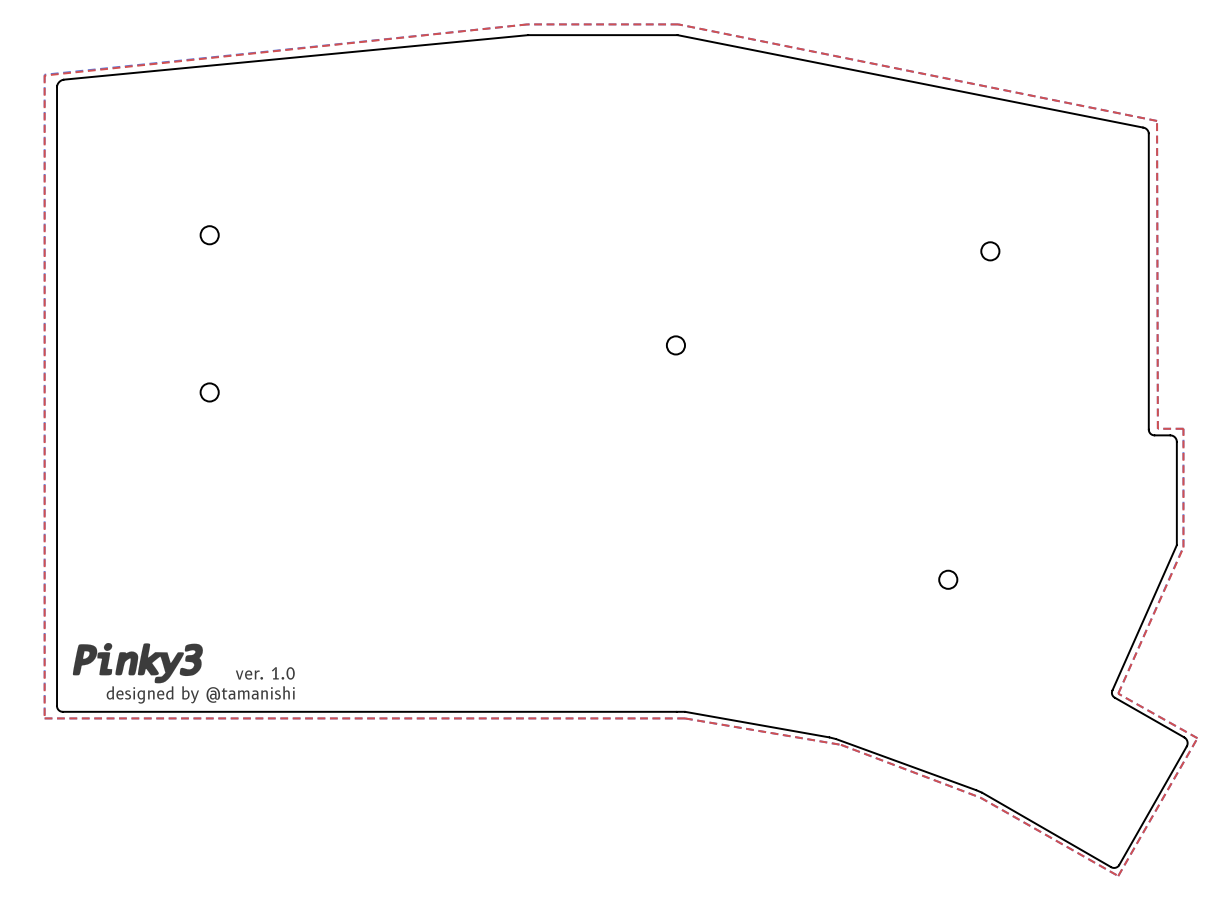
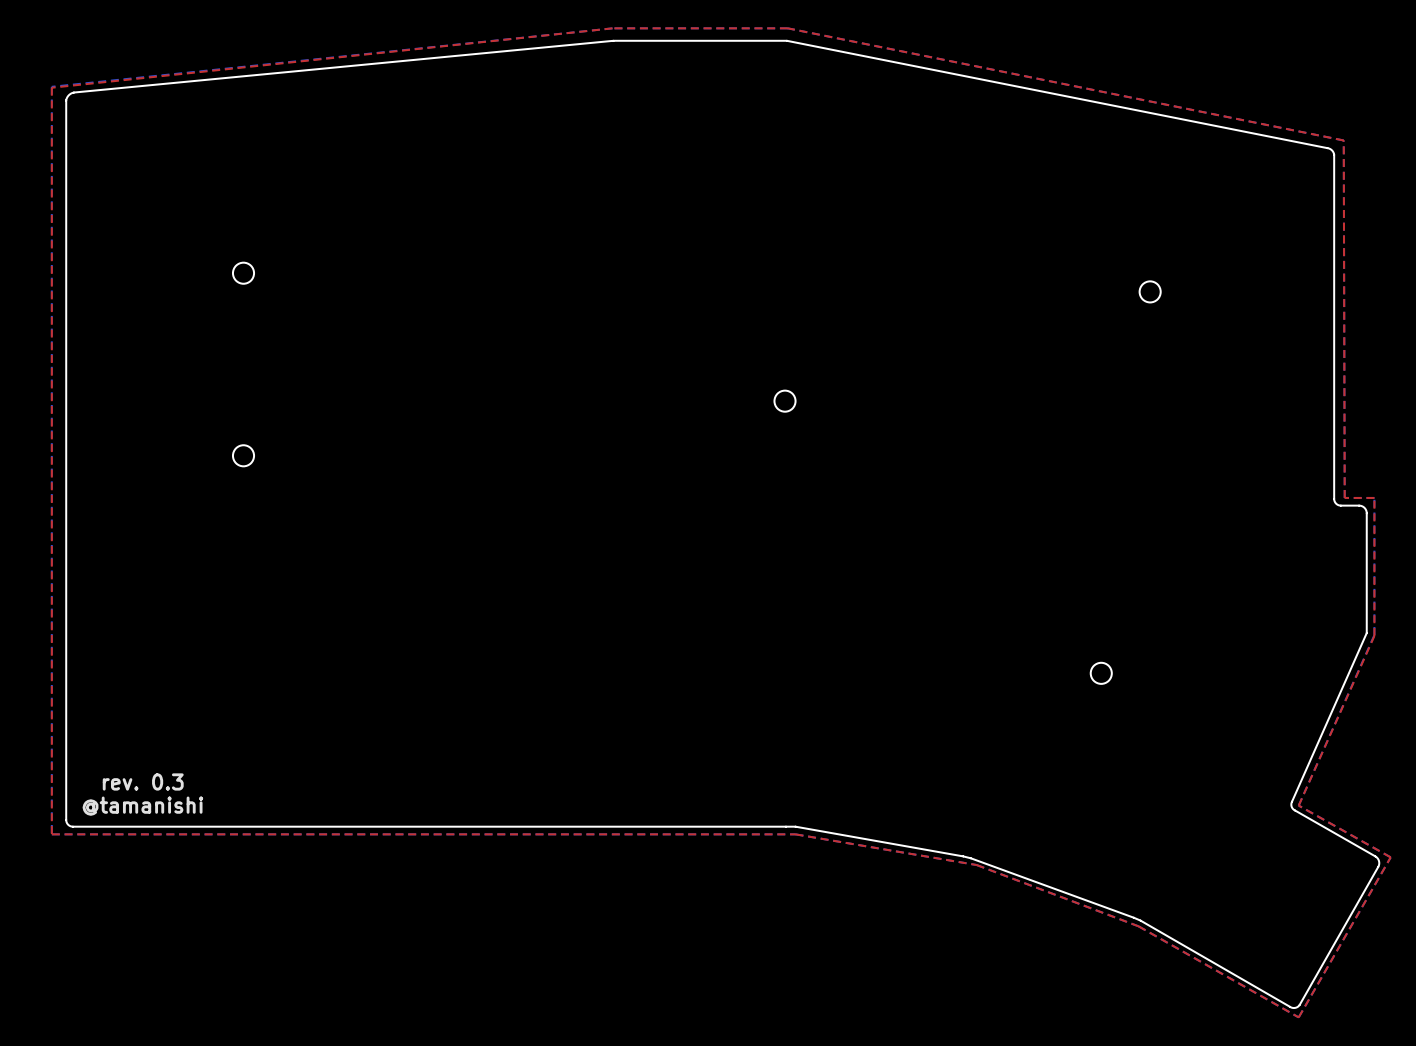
drawing: [72, 642, 203, 684] -> none
text: none -> rev. 0.3 (143, 781)
text: ver. 1.0 (265, 673) -> none
text: designed by @tamanishi (200, 694) -> @tamanishi (142, 806)

